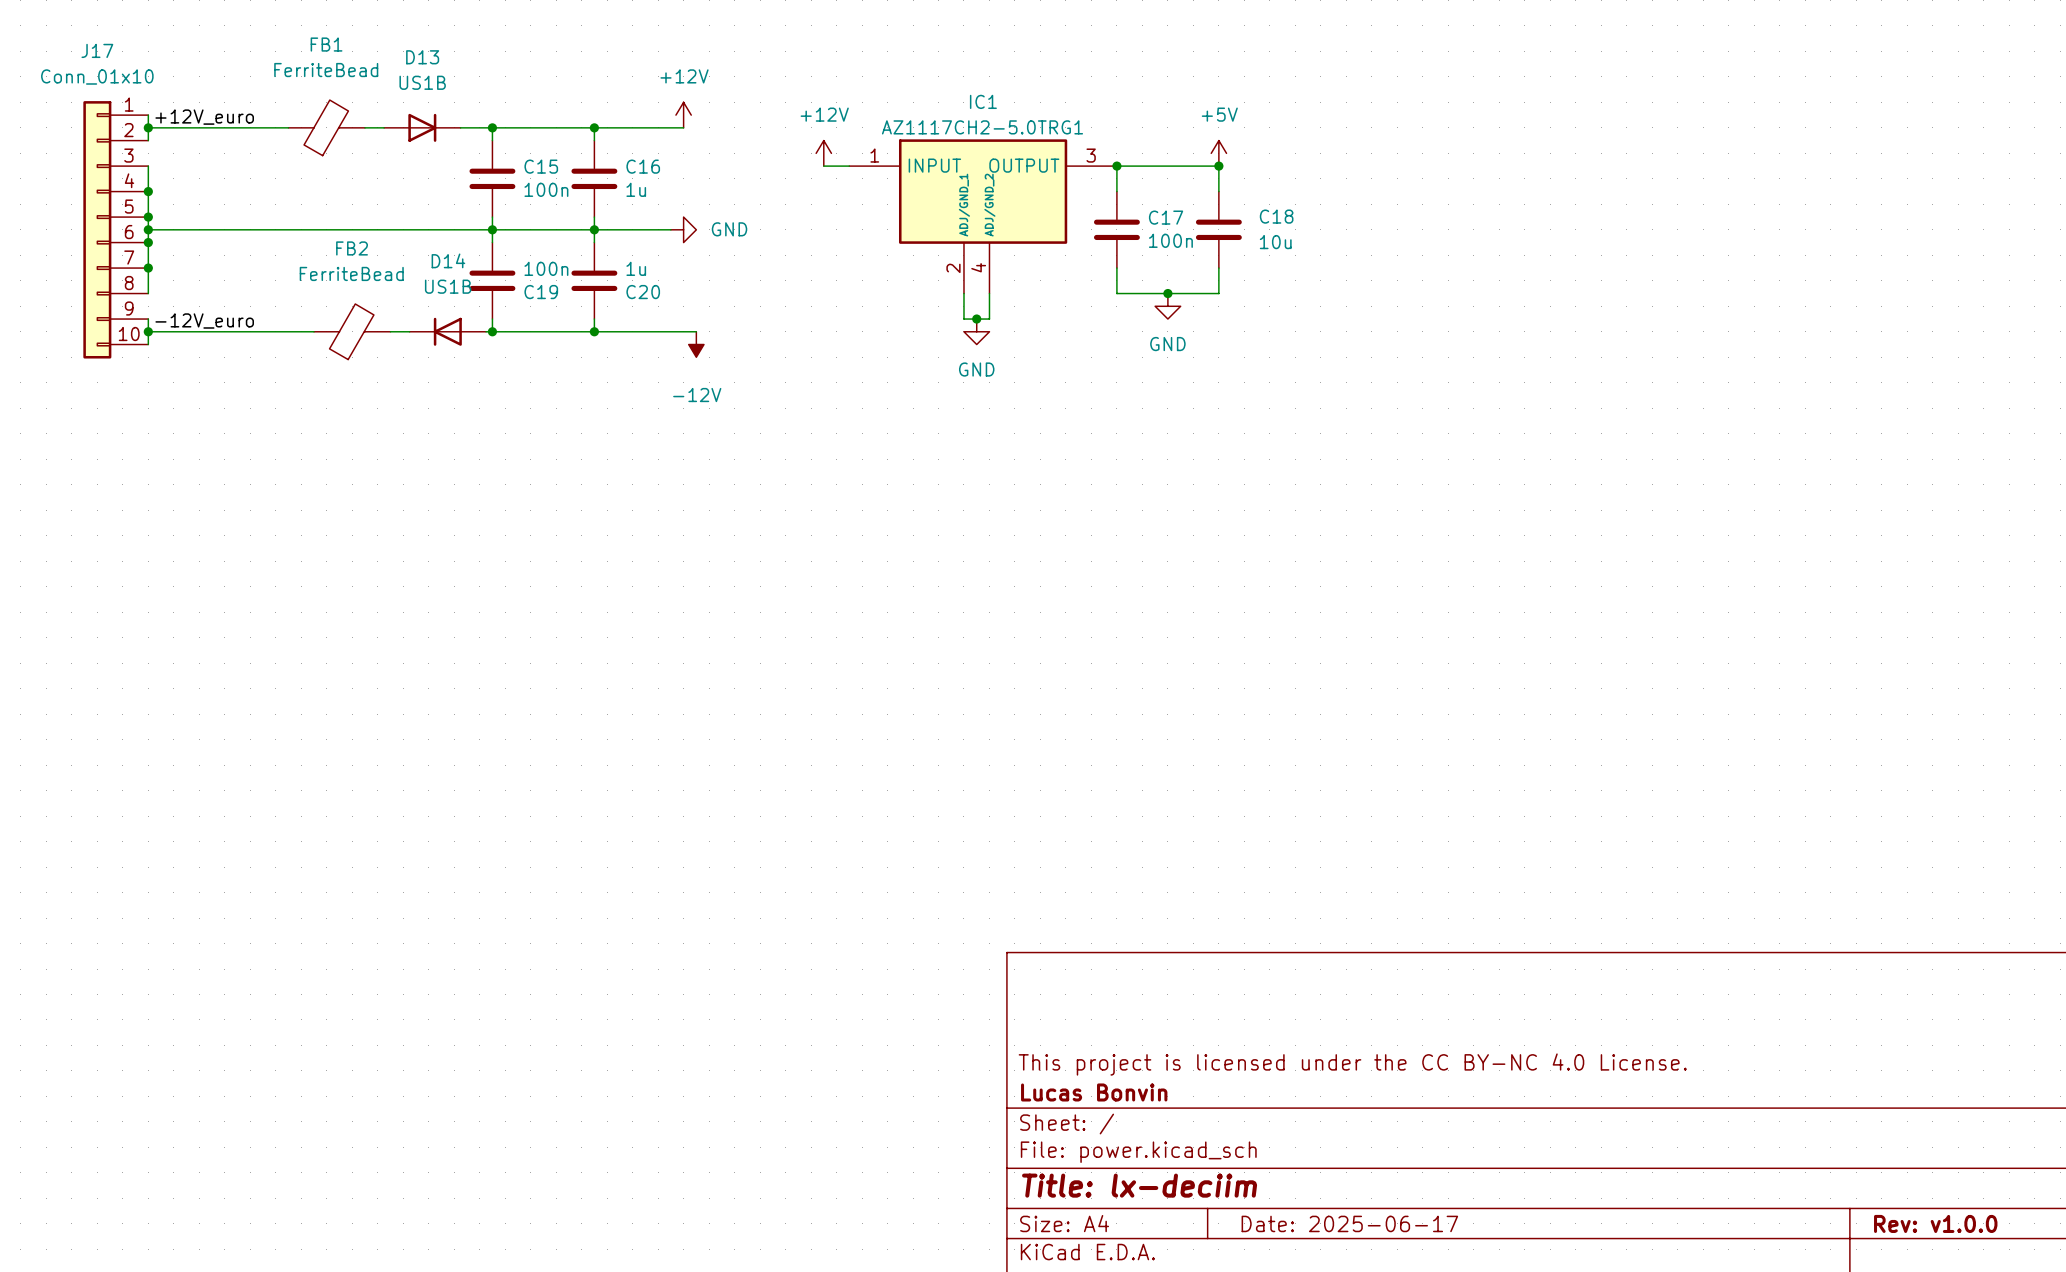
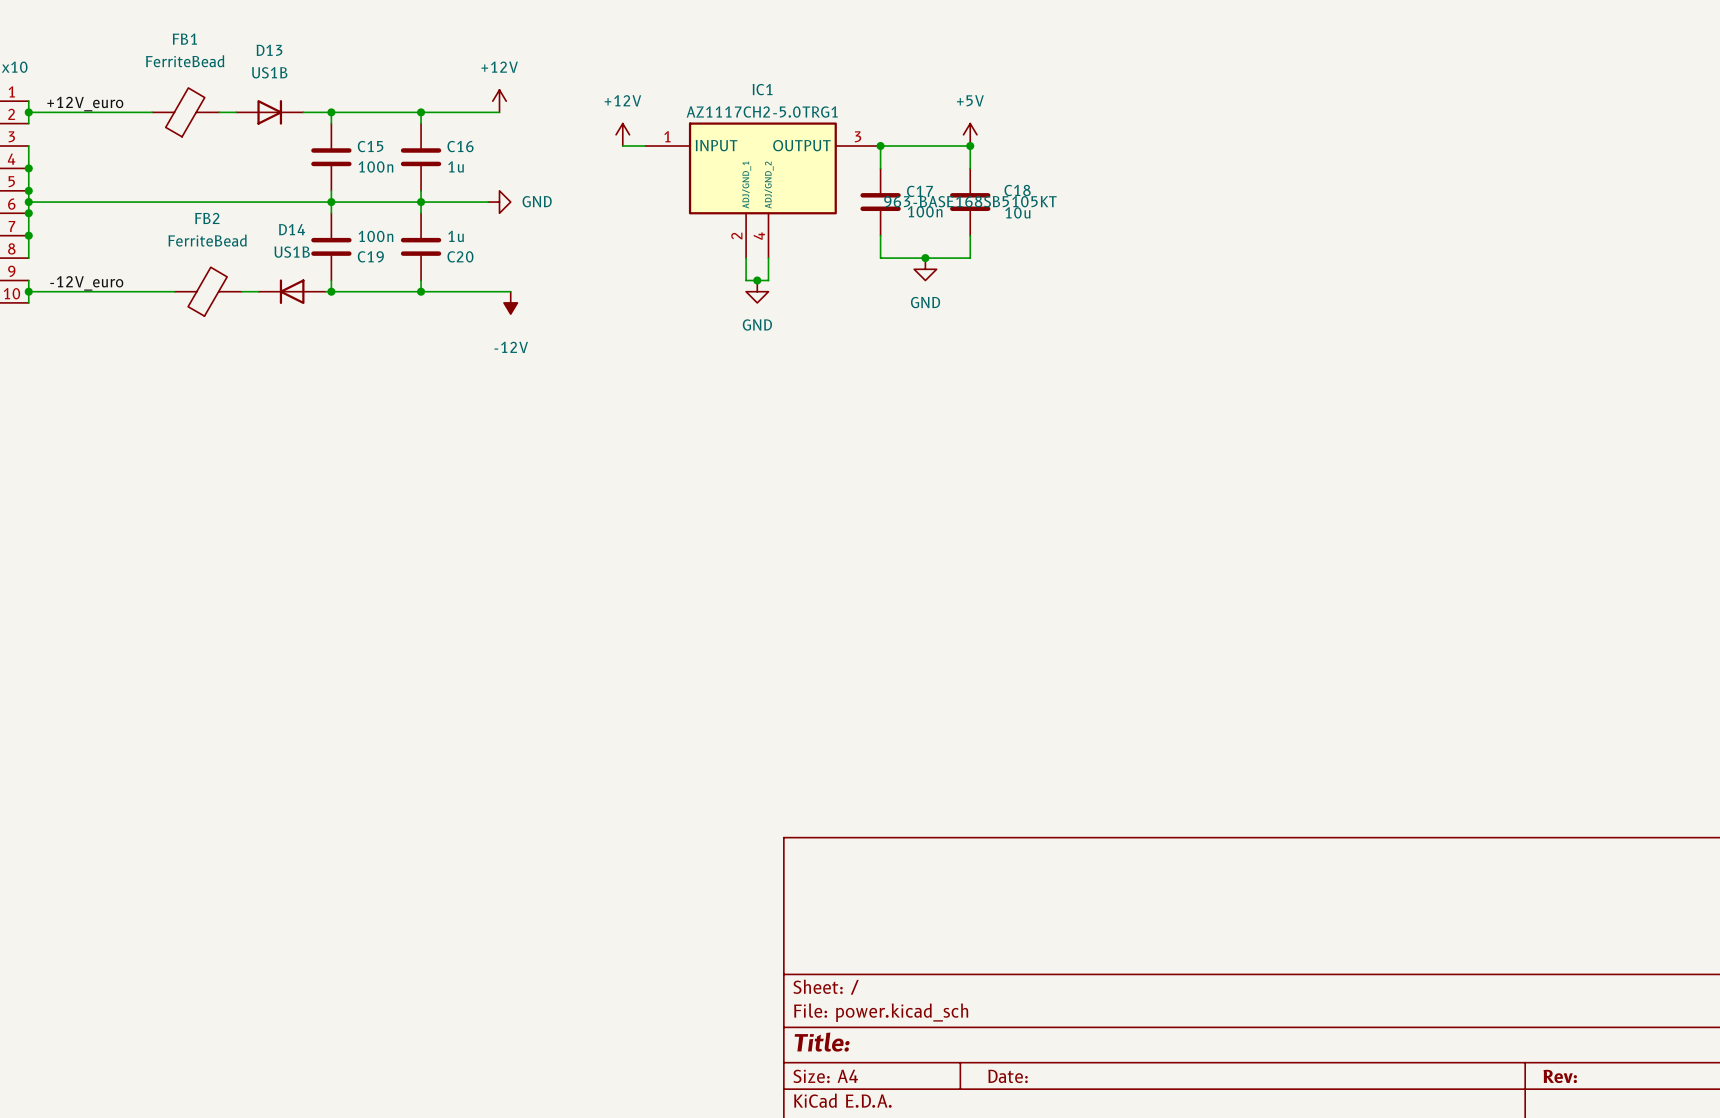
C18 text: none -> 963-BASE168SB5105KT (970, 201)
title block: This project is licensed under the CC BY-NC 4.0 License. (1352, 1064) -> none
title block: Lucas Bonvin (1094, 1092) -> none
title block: Title: lx-deciim (1139, 1185) -> Title: (822, 1042)
title block: Date: 2025-06-17 (1349, 1223) -> Date: (1008, 1076)
title block: Rev: v1.0.0 (1935, 1223) -> Rev: (1560, 1076)

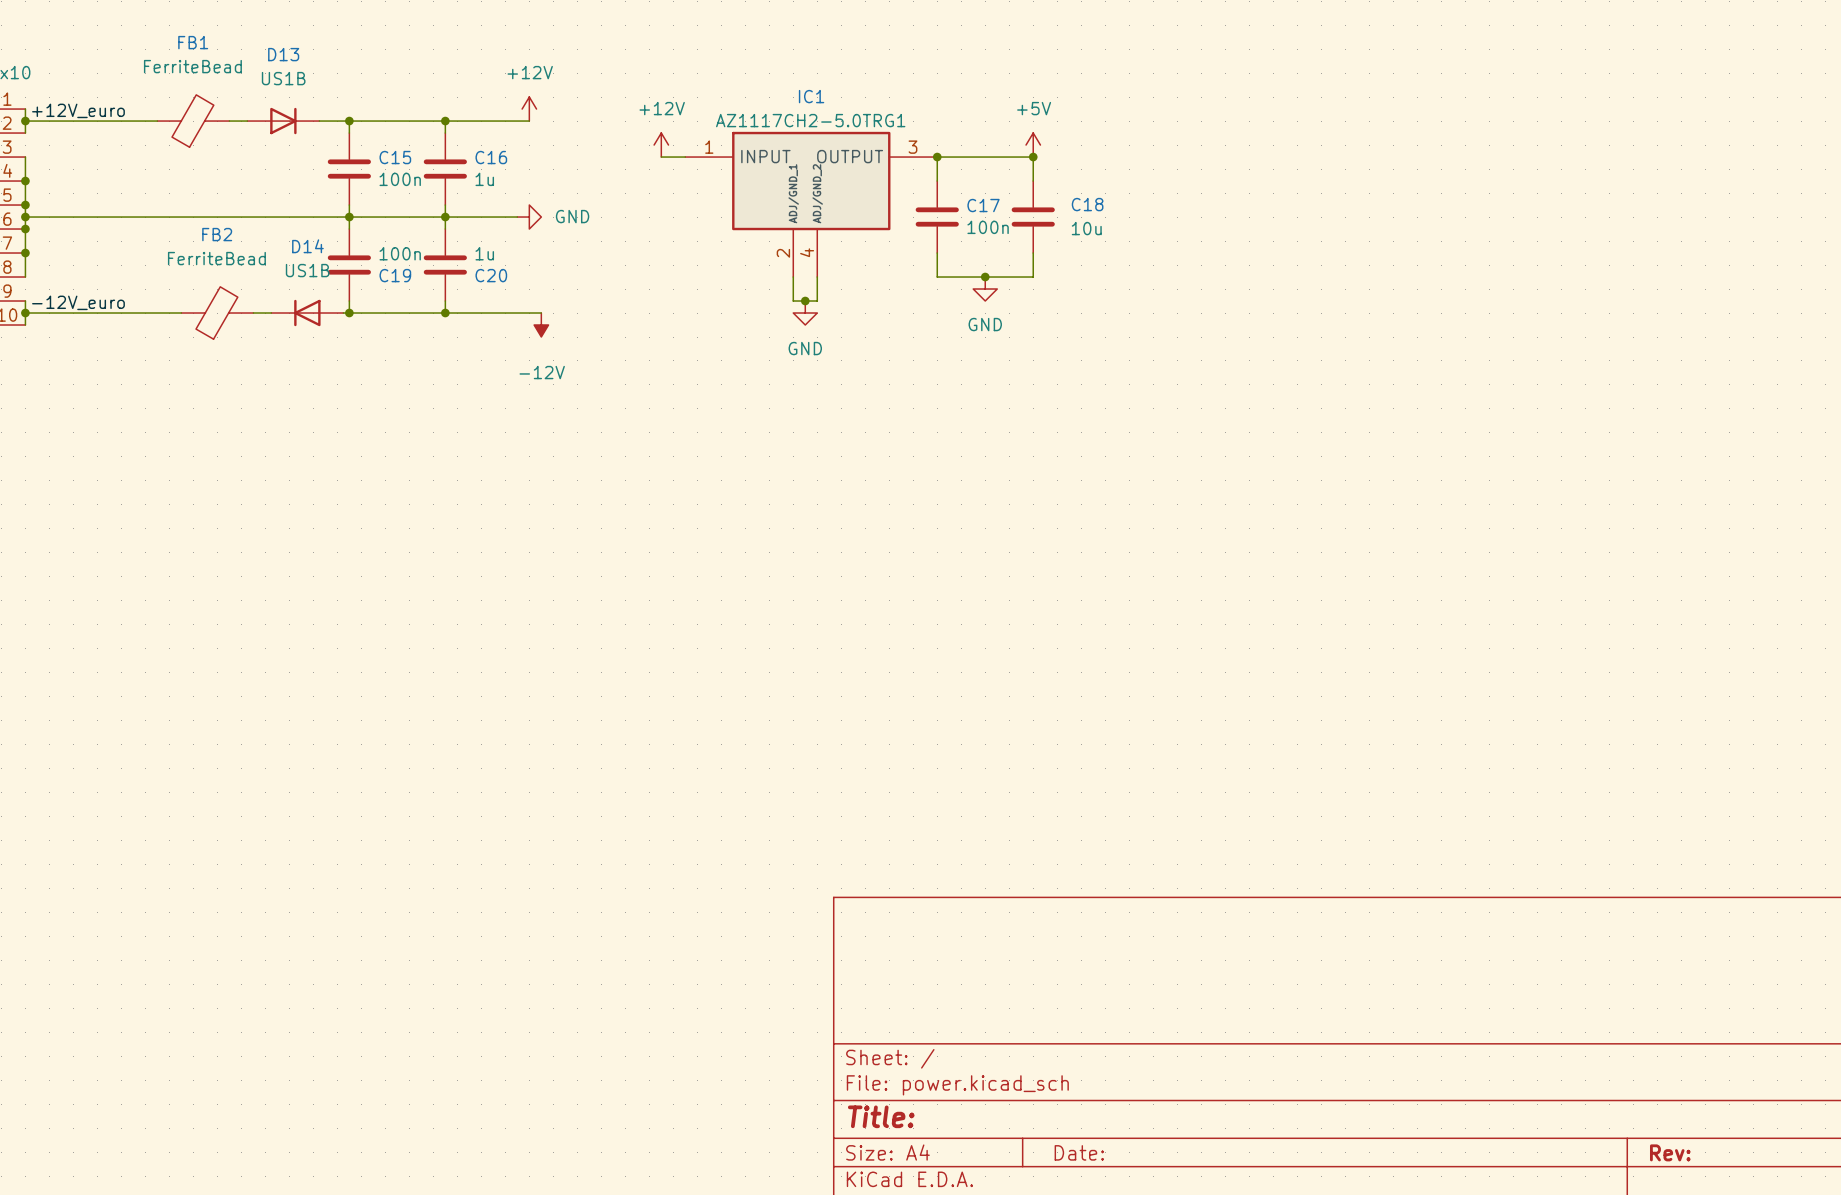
C18 text: 963-BASE168SB5105KT (970, 201) -> none

